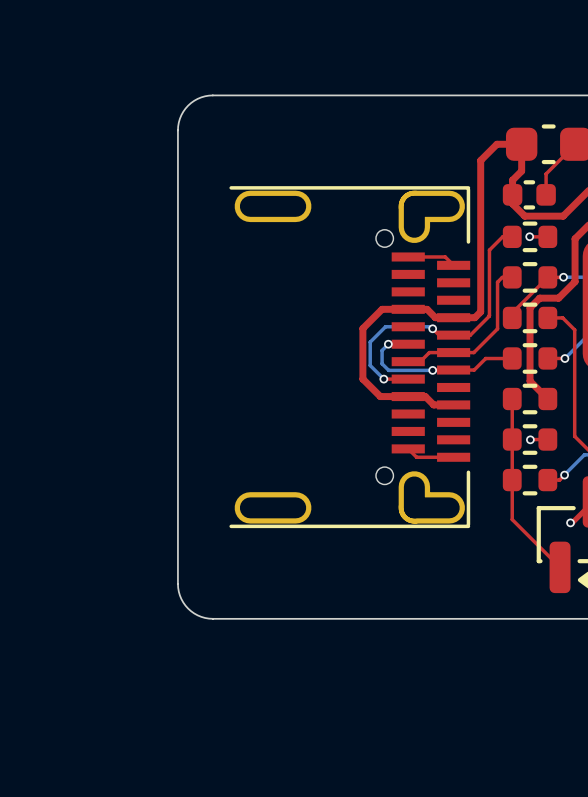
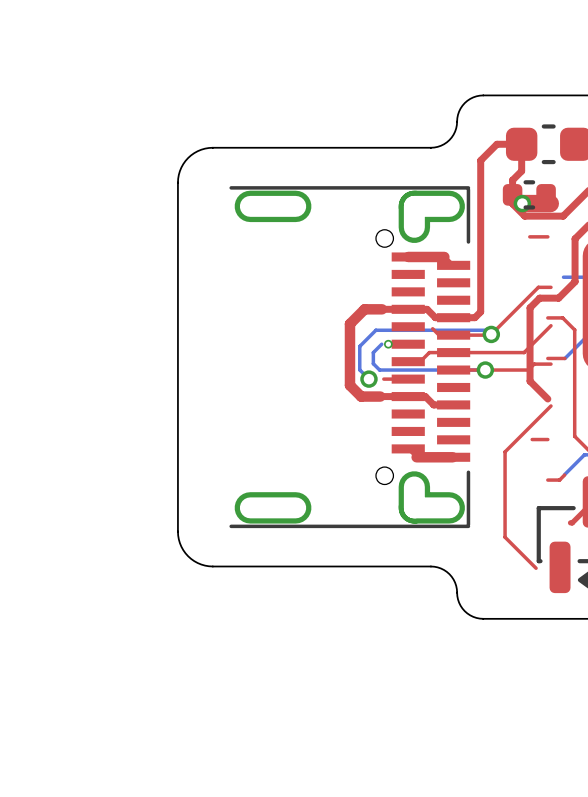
board edge: (483, 95) (205, 96) (191, 103) (179, 118) (177, 130) (177, 182) -> (483, 95) (473, 97) (464, 103) (459, 111) (453, 134) (446, 142) (437, 146) (208, 147) (194, 153) (185, 160) (179, 171) (177, 182)
top track: (575, 144) (546, 173) (546, 194) -> none
top track: none -> (522, 203) (550, 203)
via: none -> (522, 203)
top track: (512, 236) (502, 236) (489, 250) (489, 315) -> none
via: (529, 236) -> none
part: (530, 236) -> none
top track width: thin (408, 256) (444, 256) -> thick (408, 256) (444, 256)
top track: (512, 277) (502, 277) (497, 282) (497, 328) (473, 352) -> (550, 325) (524, 352) (473, 352)
part: (530, 277) -> none
top track: (563, 277) (547, 277) (512, 312) (512, 317) -> none
via: (563, 277) -> none
top track: (382, 309) (362, 328) (362, 379) (380, 396) -> (382, 309) (364, 309) (349, 323) (349, 385) (361, 396) (380, 396)
top track: (489, 316) (470, 335) -> (550, 287) (538, 287) (490, 335) (470, 335)
part: (530, 317) -> none
bottom track: (432, 328) (430, 326) (385, 326) (370, 342) (370, 365) (383, 379) -> none
via: (432, 328) -> none
bottom track: none -> (491, 334) (487, 330) (375, 330) (359, 346) (359, 369) (368, 379)
via: none -> (491, 334)
bottom track: none -> (381, 344) (373, 352) (373, 363) (379, 370) (485, 370)
bottom track: (388, 344) (382, 350) (382, 363) (388, 370) (432, 370) -> none
top track: (512, 358) (485, 358) (474, 370) -> (550, 364) (534, 364) (528, 370) (474, 370)
part: (530, 358) -> none
via: (564, 358) -> none
via: (432, 370) -> none
via: none -> (485, 370)
via: none -> (368, 379)
via: (383, 379) -> none
top track: (512, 399) (512, 519) (560, 567) -> none
part: (530, 399) -> none
top track: none -> (550, 405) (505, 451) (505, 537) (536, 568)
part: (530, 439) -> none
via: (530, 439) -> none
top track width: thin (416, 457) (452, 457) -> thick (416, 457) (452, 457)
via: (564, 475) -> none
part: (530, 480) -> none
via: (570, 522) -> none
board edge: (177, 531) (177, 583) (179, 595) (191, 611) (205, 617) (483, 618) -> (177, 531) (179, 543) (185, 553) (194, 561) (208, 566) (437, 567) (446, 571) (453, 579) (459, 602) (464, 611) (473, 616) (483, 618)

